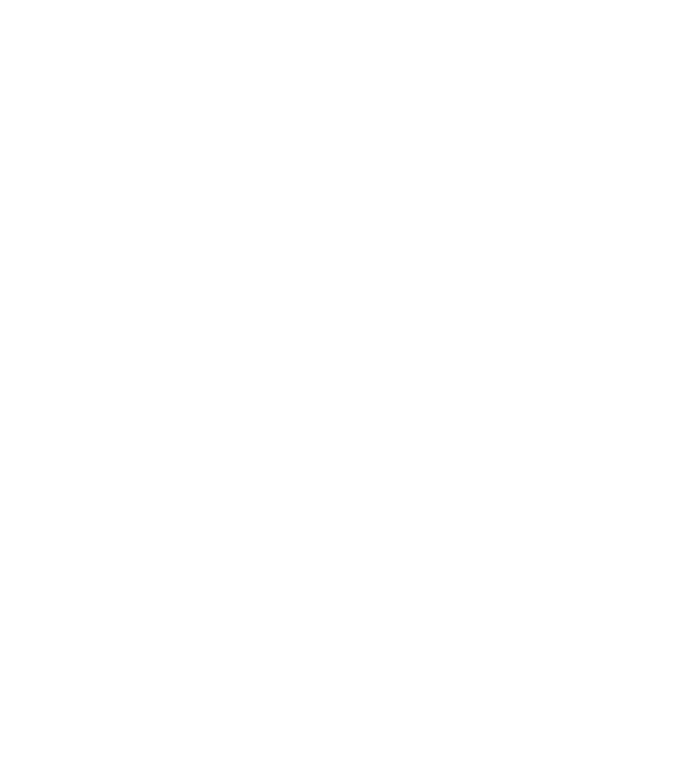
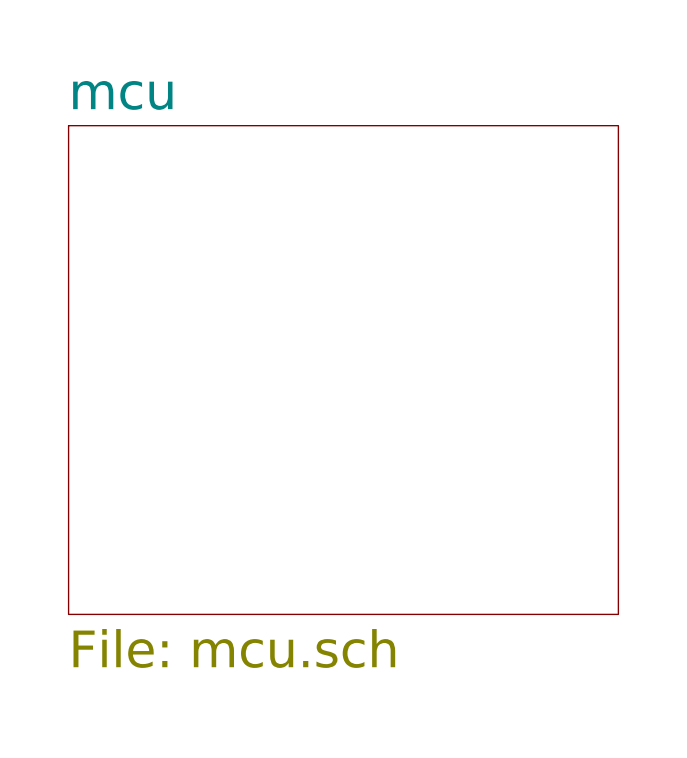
sheet mcu: none -> File: mcu.sch (343, 370)

